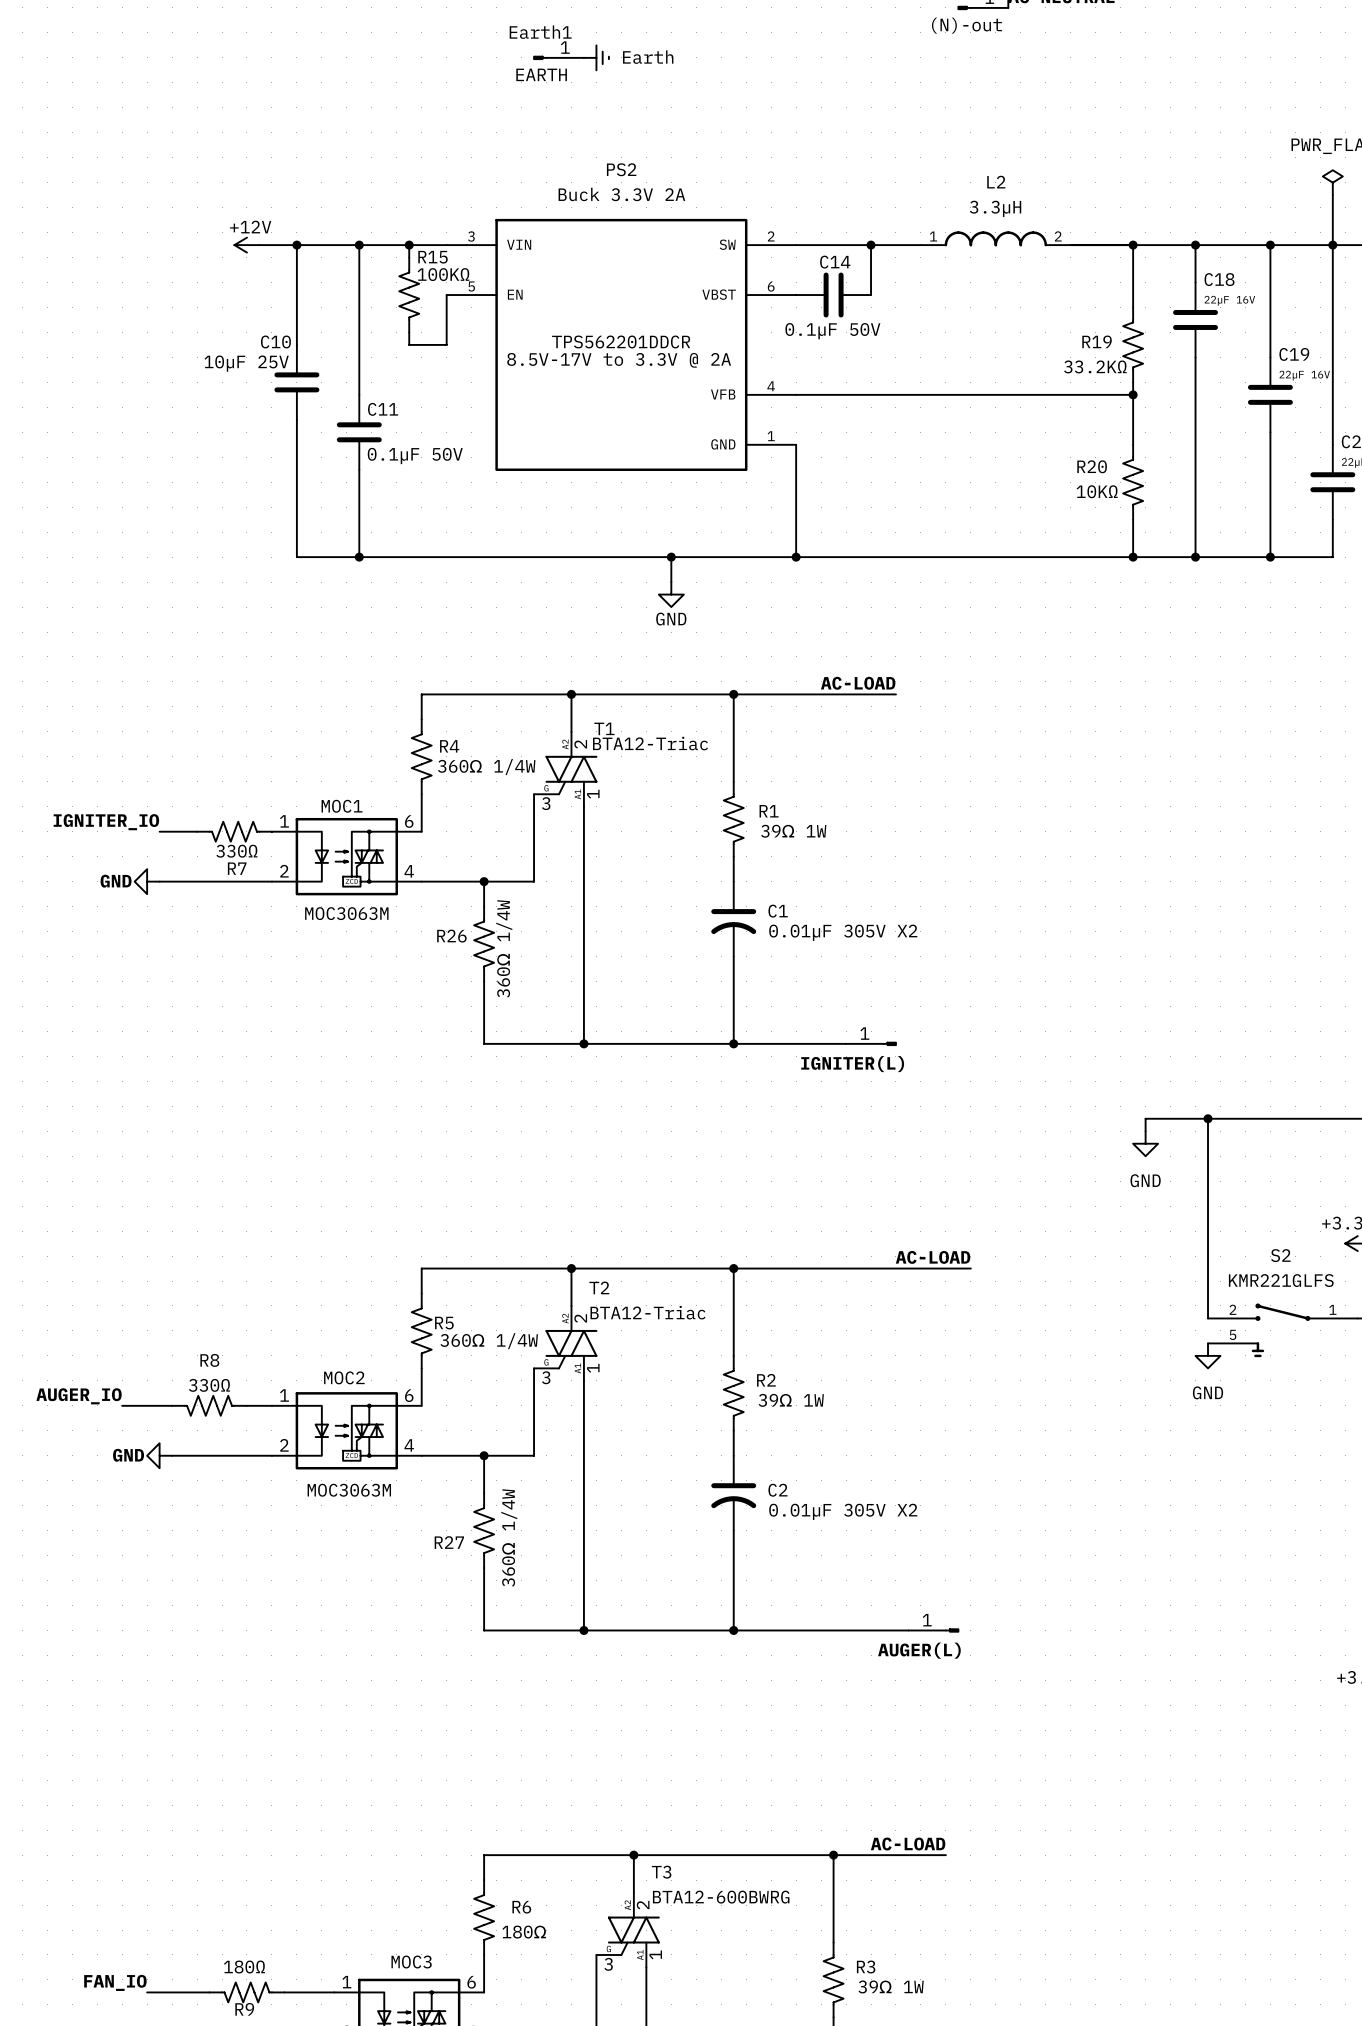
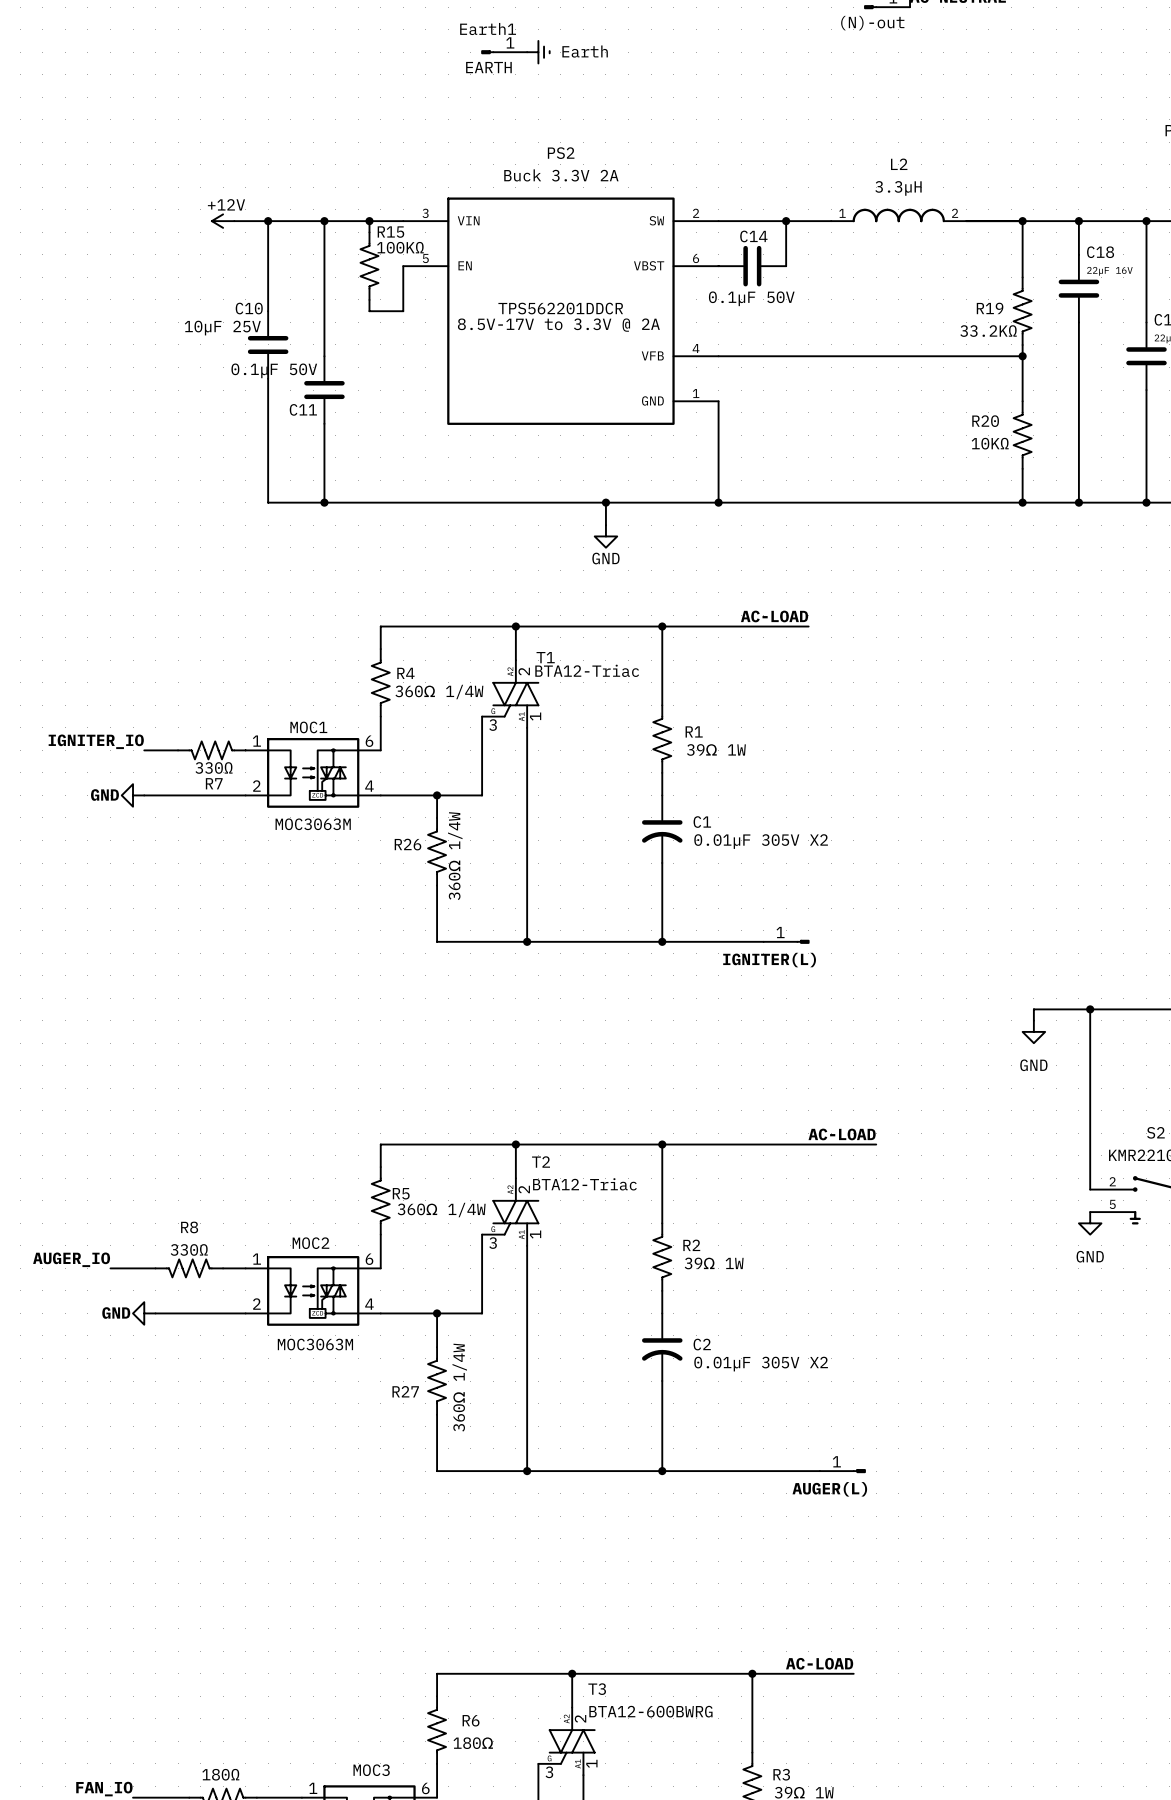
C11 name position: C11 (383, 409) -> C11 (303, 409)
C11 value position: 0.1µF 50V (415, 455) -> 0.1µF 50V (274, 370)

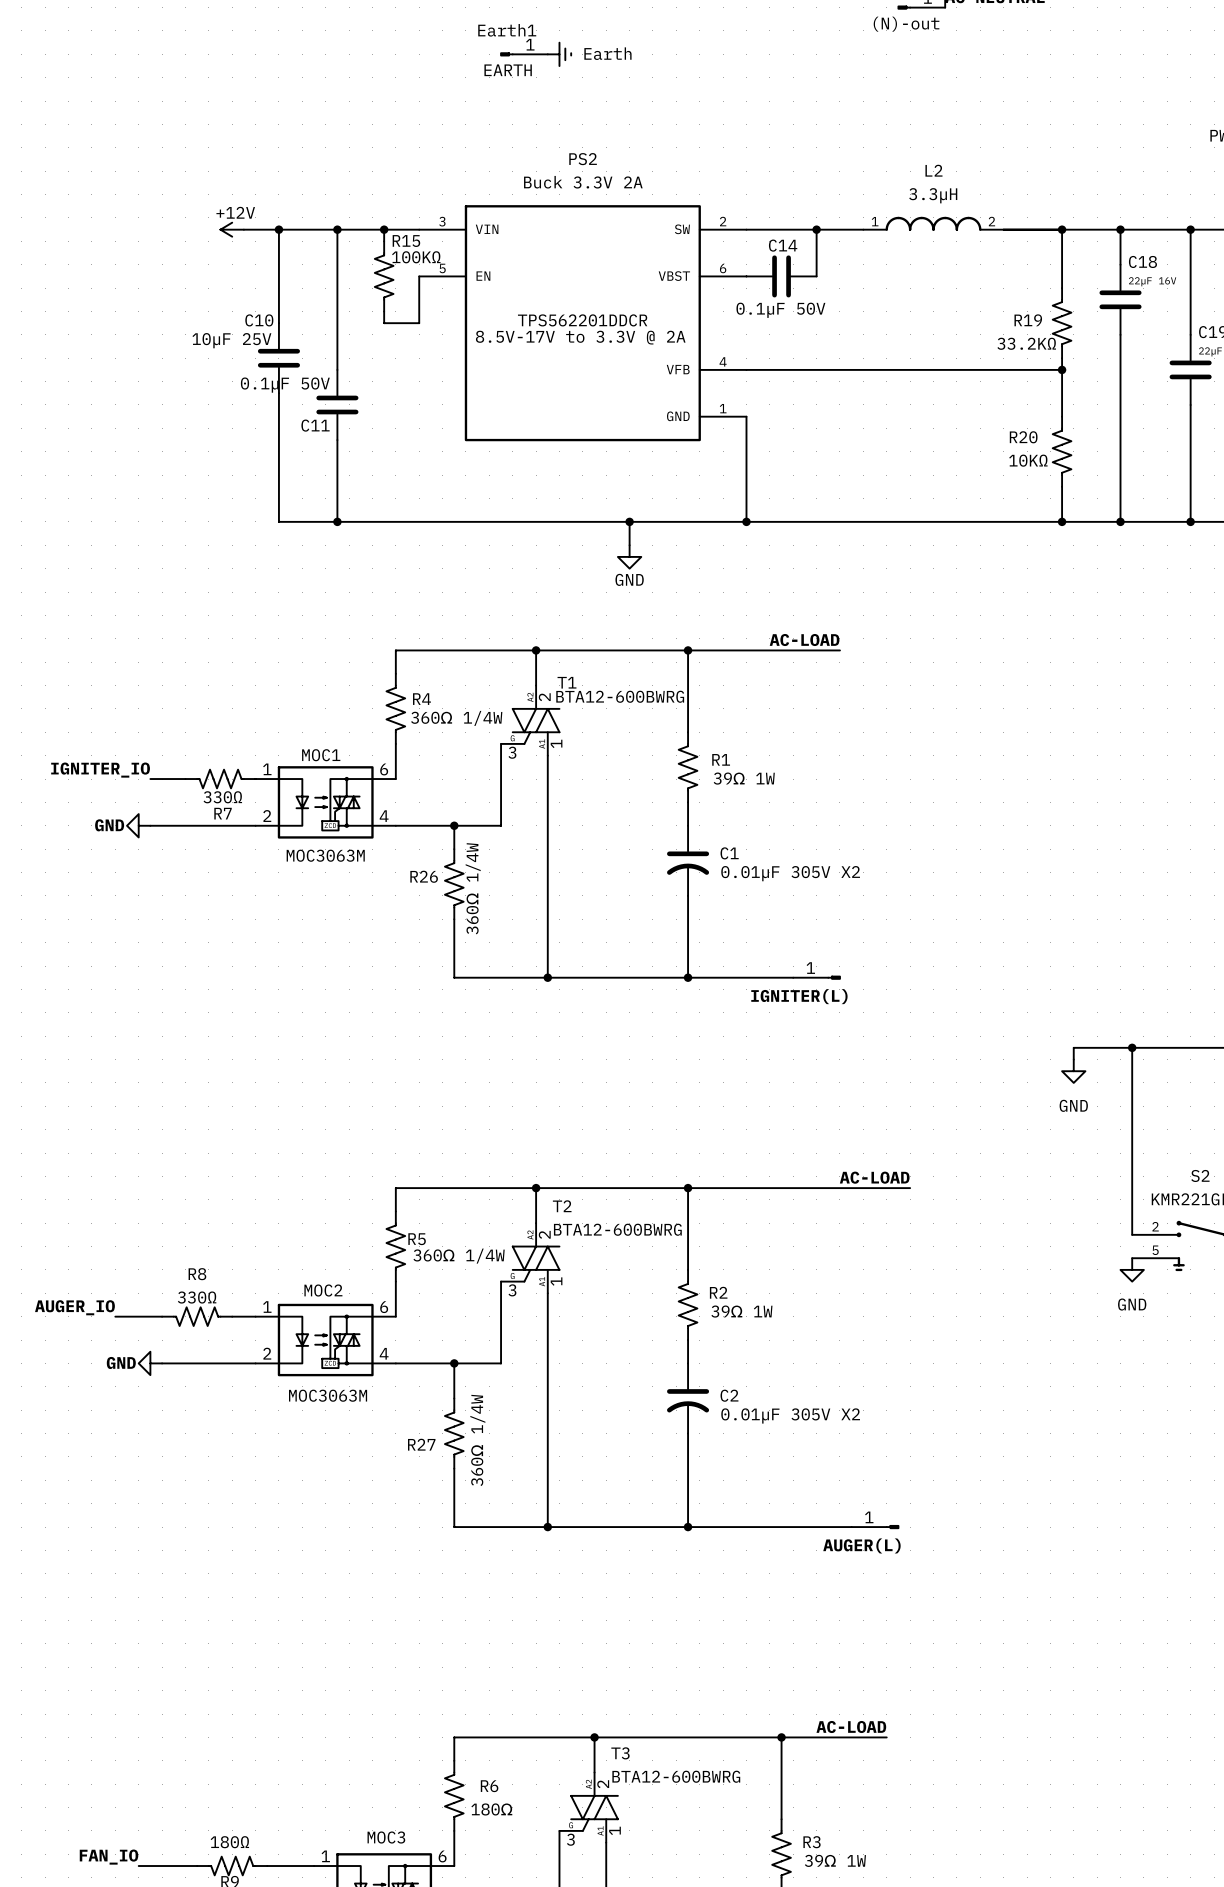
T1 value: BTA12-Triac (587, 670) -> BTA12-600BWRG (620, 696)
T2 value: BTA12-Triac (584, 1184) -> BTA12-600BWRG (617, 1229)

